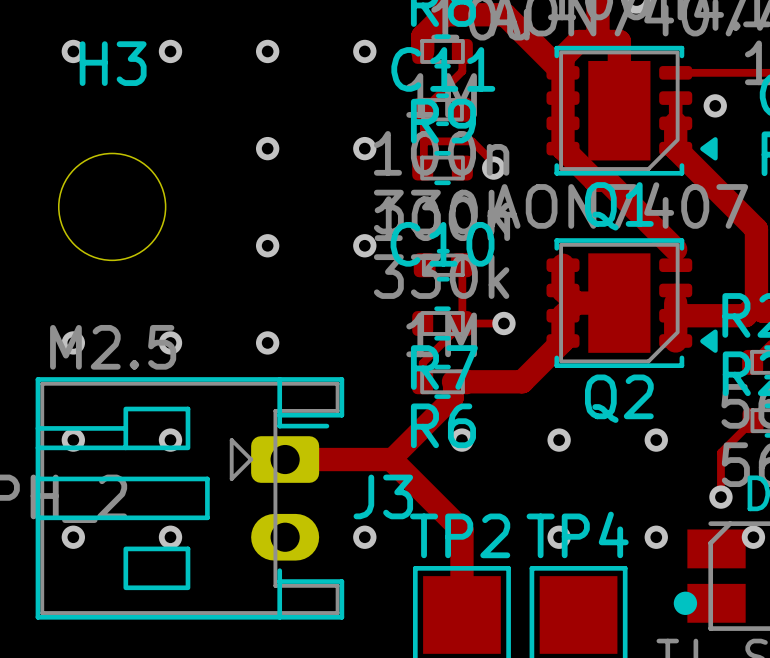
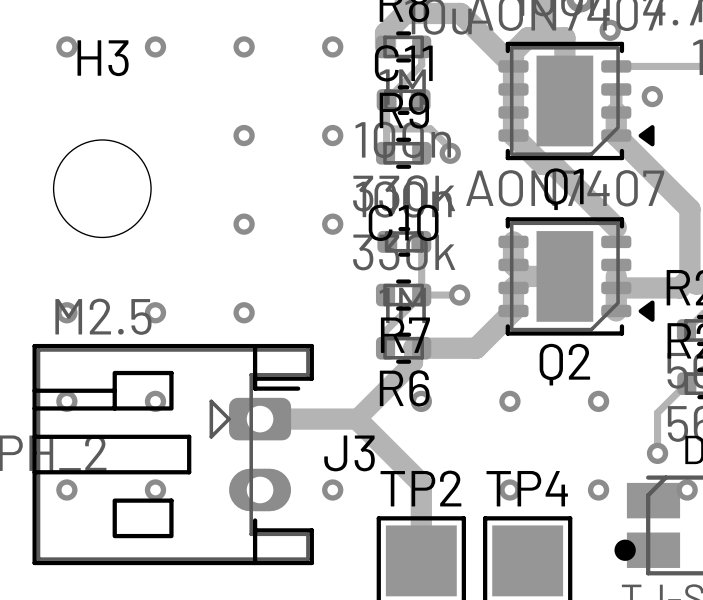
via: none -> (610, 30)

